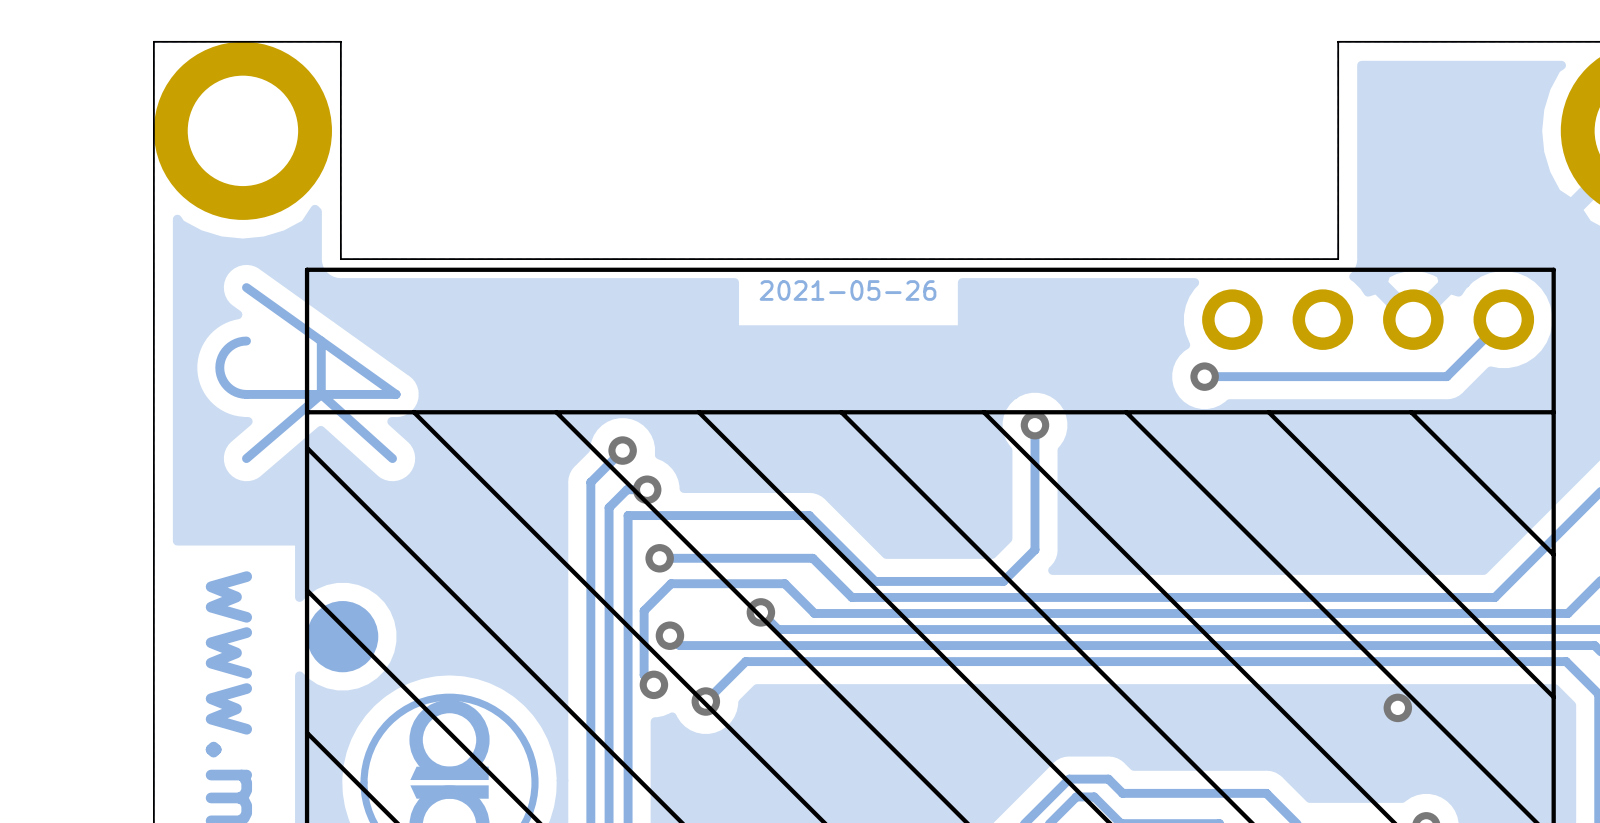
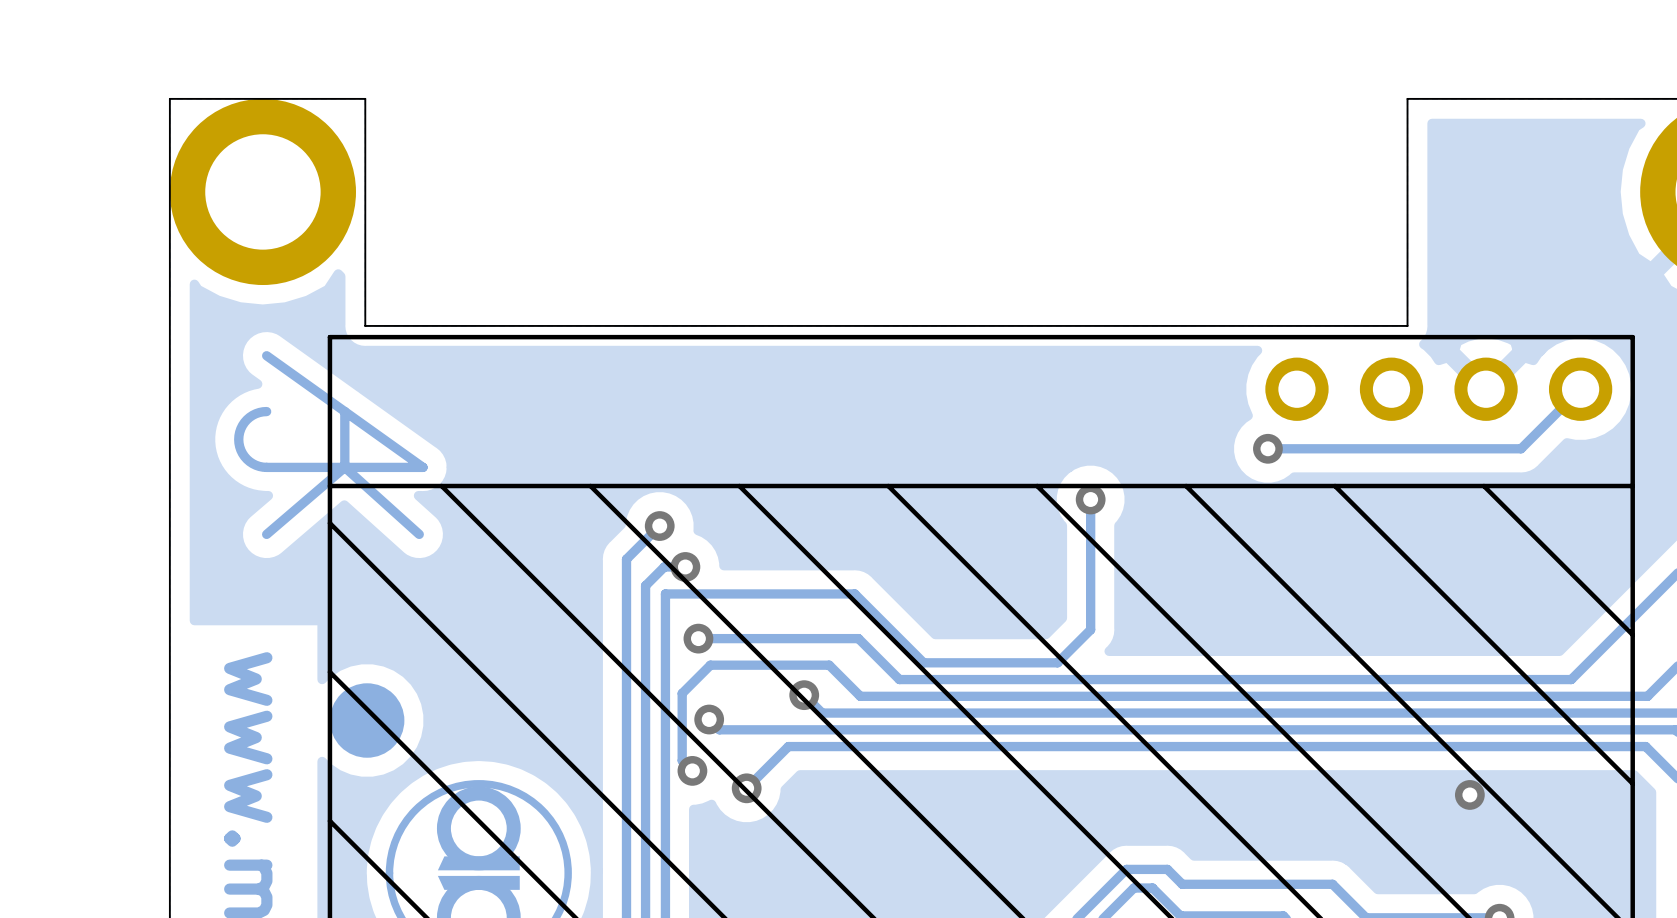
text: 2021-05-26 (848, 290) -> none

